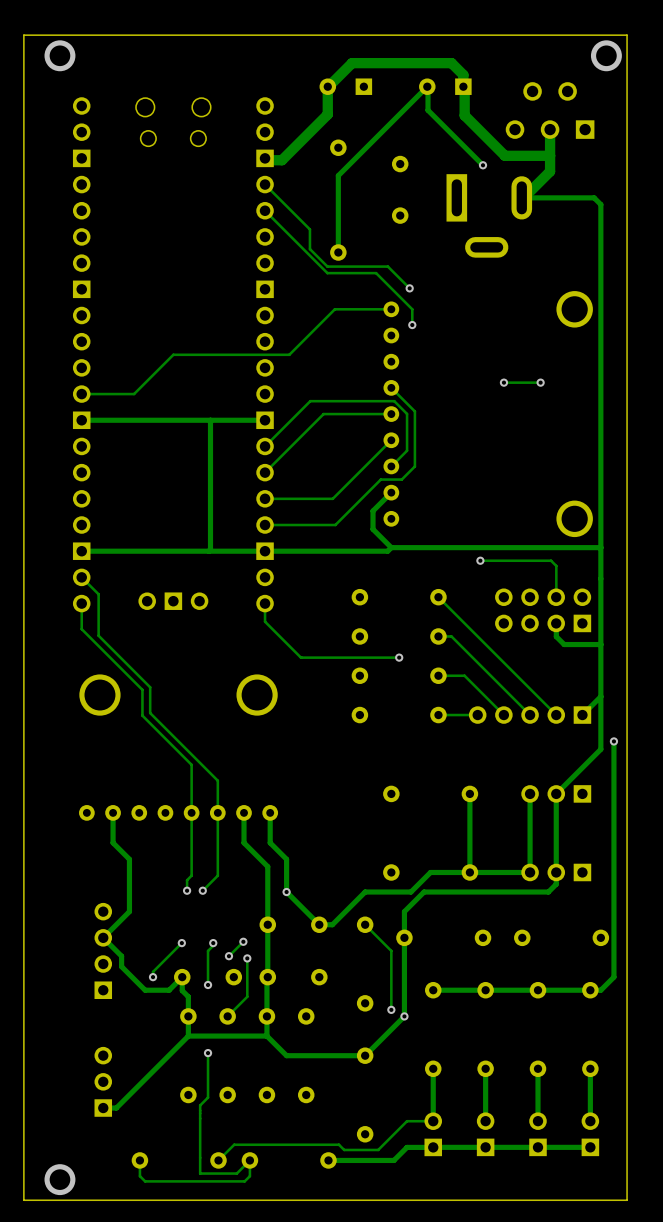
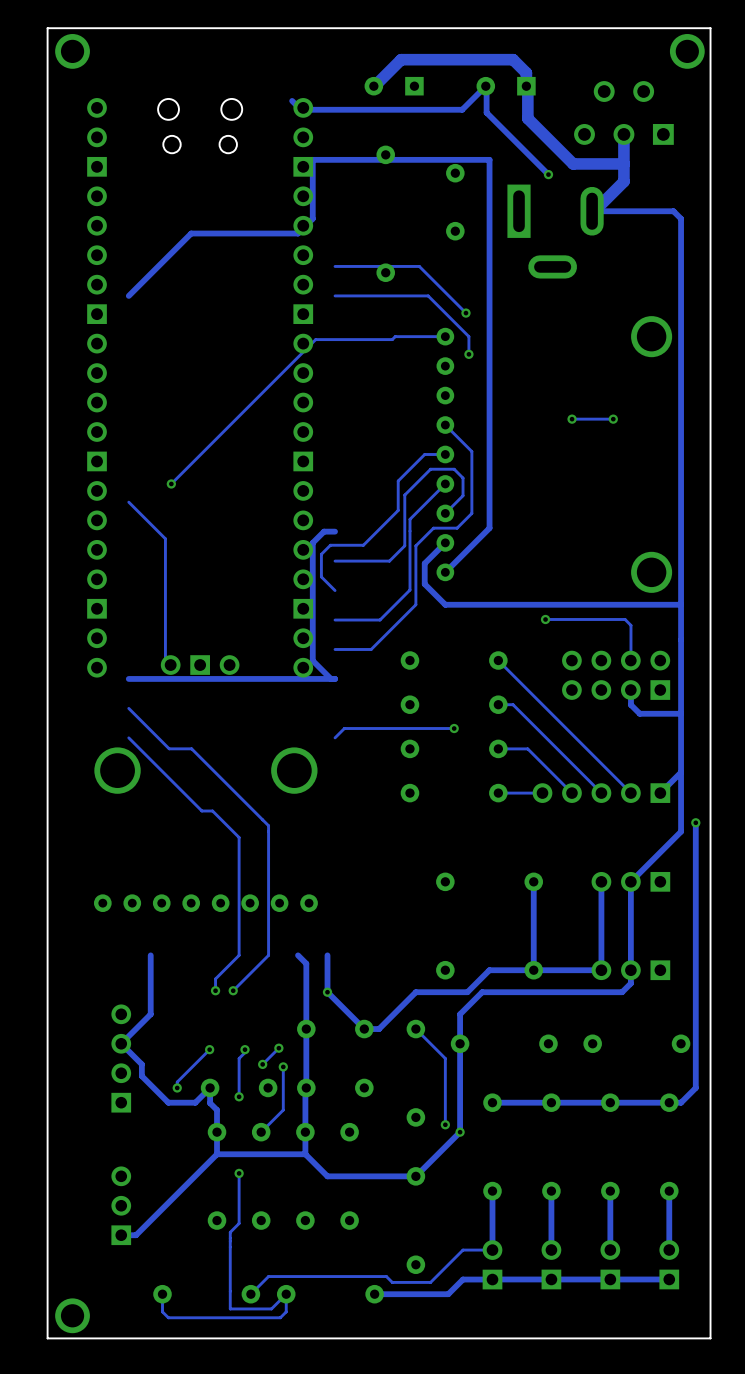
board edge: (37, 35) (23, 35) (23, 1200) (627, 1199) -> (47, 28) (47, 1338) (710, 1338)
track: (327, 86) (327, 114) (281, 160) (266, 160) (265, 158) -> none
track: (406, 107) (338, 175) (338, 252) -> (462, 109) (300, 109) (292, 100)
track: (265, 184) (309, 229) (309, 249) (327, 266) (387, 266) -> (335, 266) (419, 266) (441, 288)
track: (265, 210) (327, 273) -> (335, 295) (373, 295)
track: none -> (128, 295) (191, 233) (298, 233) (312, 218) (312, 159) (489, 159) (489, 528) (445, 572)
track: (346, 309) (334, 309) (289, 354) (173, 354) (134, 394) (81, 394) -> (395, 336) (392, 339) (315, 339) (171, 483)
track: (373, 414) (323, 414) (265, 472) -> (424, 454) (398, 481) (398, 510) (363, 545) (330, 545) (321, 554) (321, 576) (335, 590)
track: (210, 420) (210, 549) (208, 551) -> none
track: (265, 420) (81, 420) -> (335, 678) (128, 678)
track: (407, 435) (407, 413) (394, 401) (310, 401) (265, 446) -> (463, 478) (454, 469) (430, 469) (404, 495) (404, 545) (389, 561) (335, 561)
via: none -> (171, 483)
track: none -> (128, 502) (165, 538) (165, 660)
track: (359, 471) (332, 498) (265, 498) -> (410, 519) (410, 590) (380, 620) (335, 620)
track: none -> (335, 531) (324, 531) (312, 542) (312, 660) (330, 678)
track: (365, 495) (335, 525) (265, 525) -> (415, 545) (415, 604) (371, 649) (335, 649)
track: (391, 547) (387, 551) (81, 551) -> none
track: (81, 577) (98, 594) (98, 635) (150, 687) (150, 713) (217, 780) (217, 875) -> (128, 708) (169, 748) (191, 748) (268, 825) (268, 955) (250, 973)
track: (81, 603) (81, 629) (142, 689) (142, 715) (191, 764) (191, 875) -> (128, 737) (201, 811) (212, 811) (239, 837) (239, 955) (220, 973)
track: (265, 603) (265, 621) (301, 657) -> (335, 737) (344, 728)
track: (113, 812) (113, 842) (129, 859) -> none
track: (244, 812) (244, 842) (260, 859) -> none
track: (270, 812) (270, 842) (286, 859) -> none

